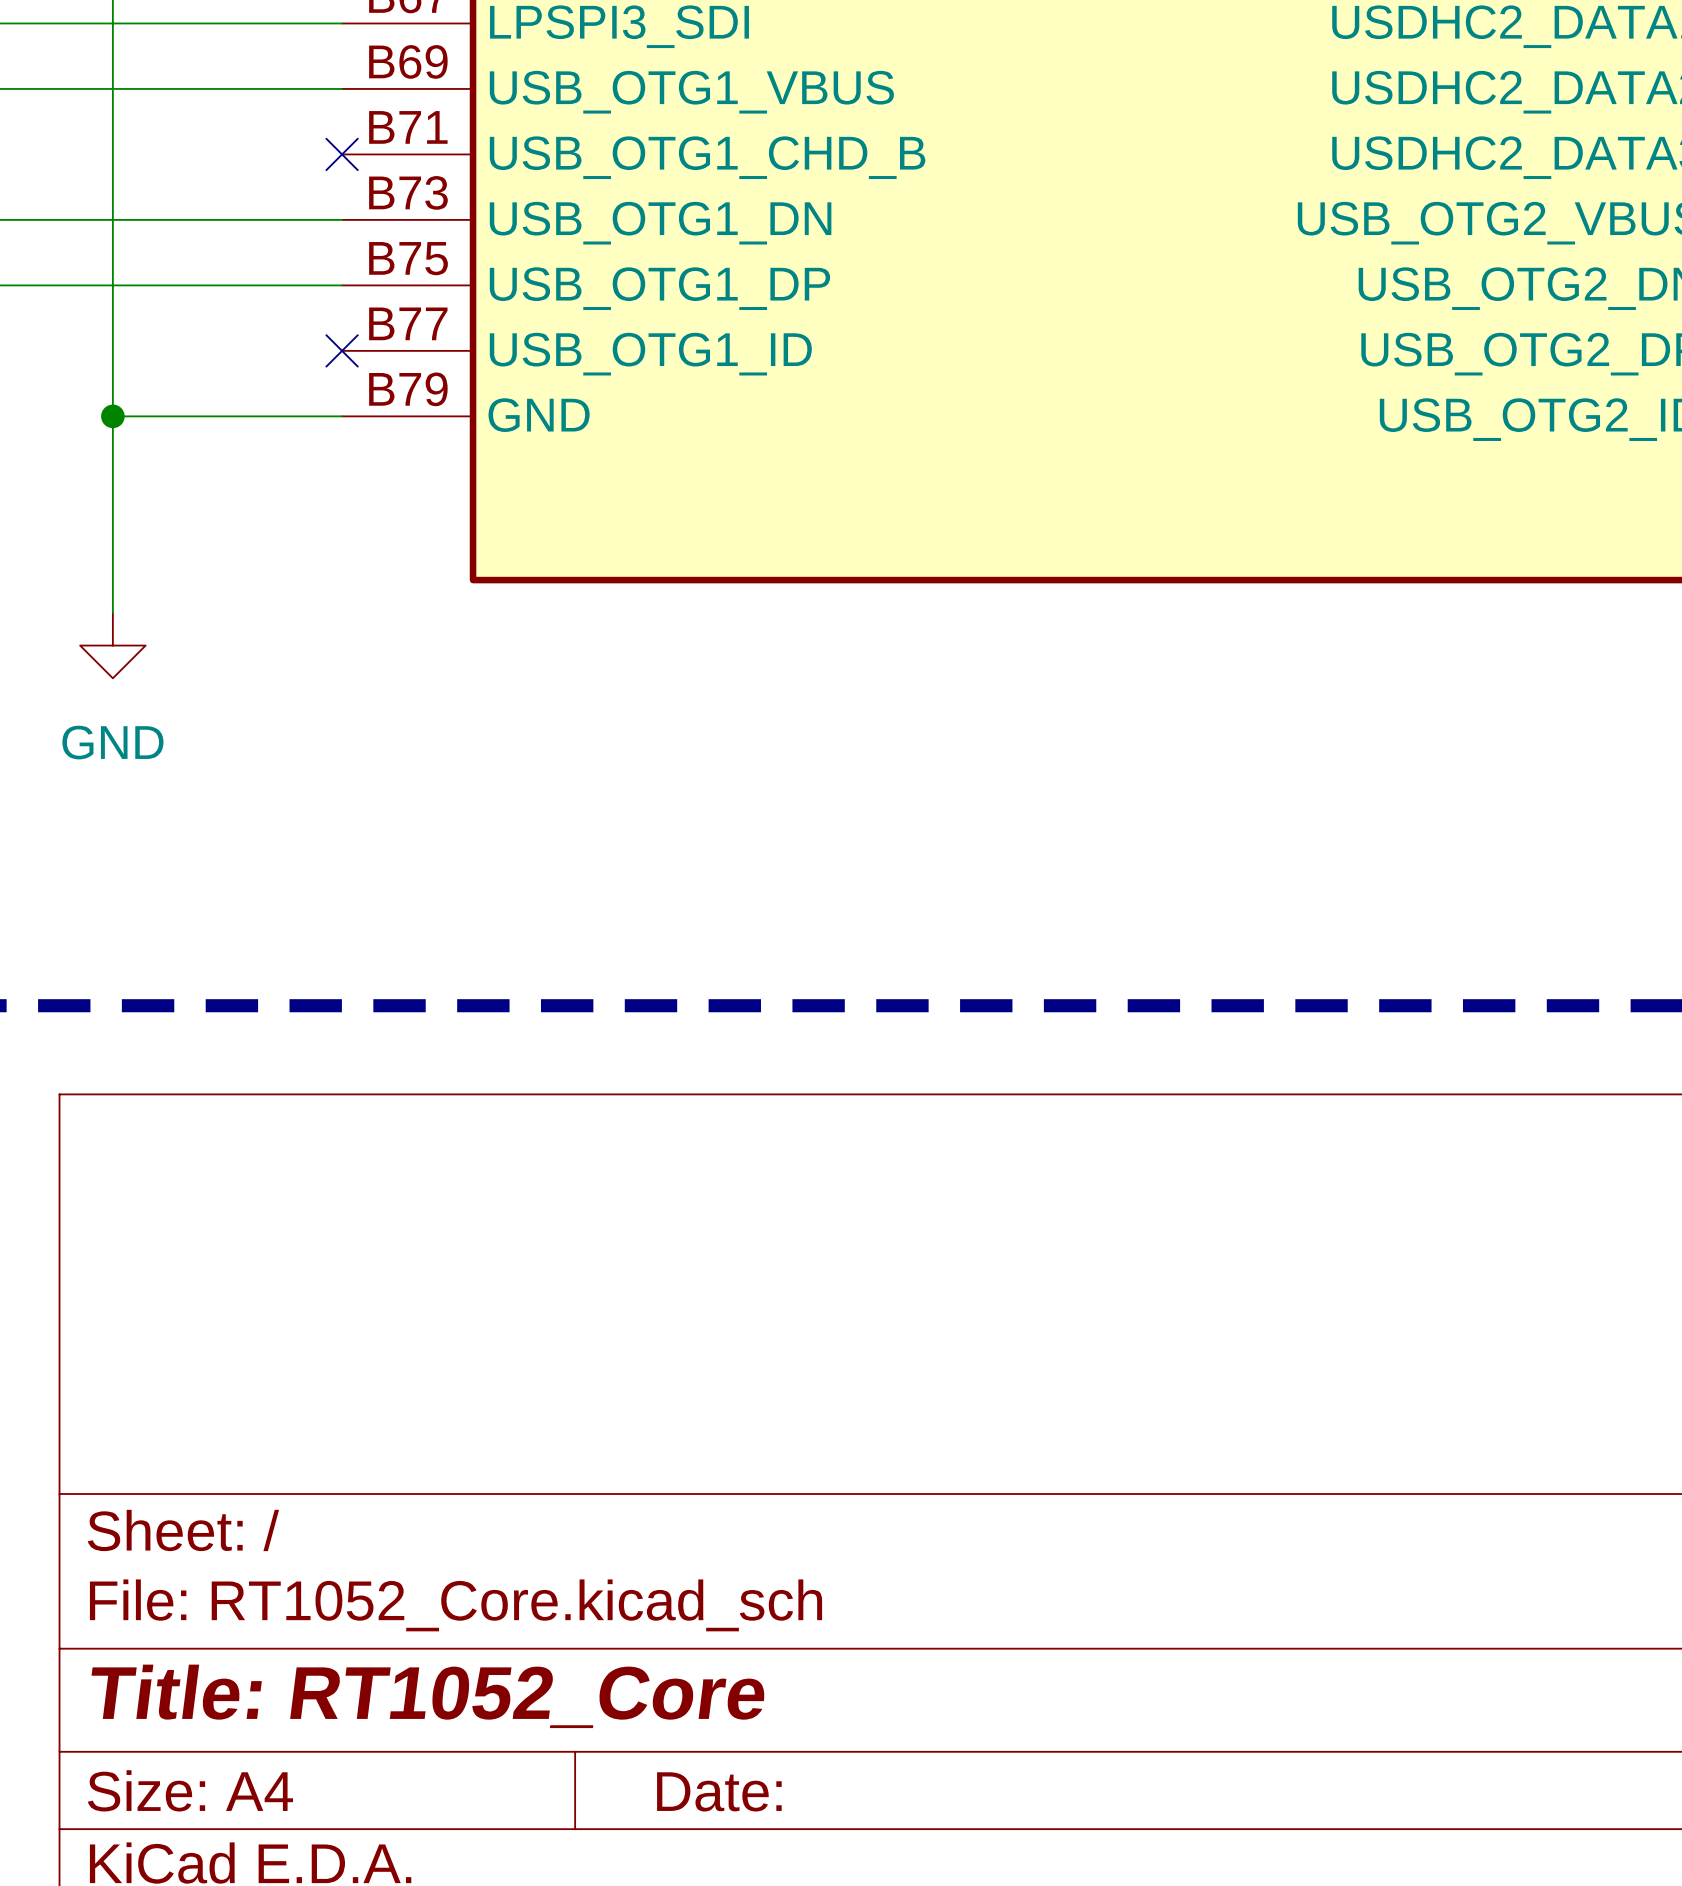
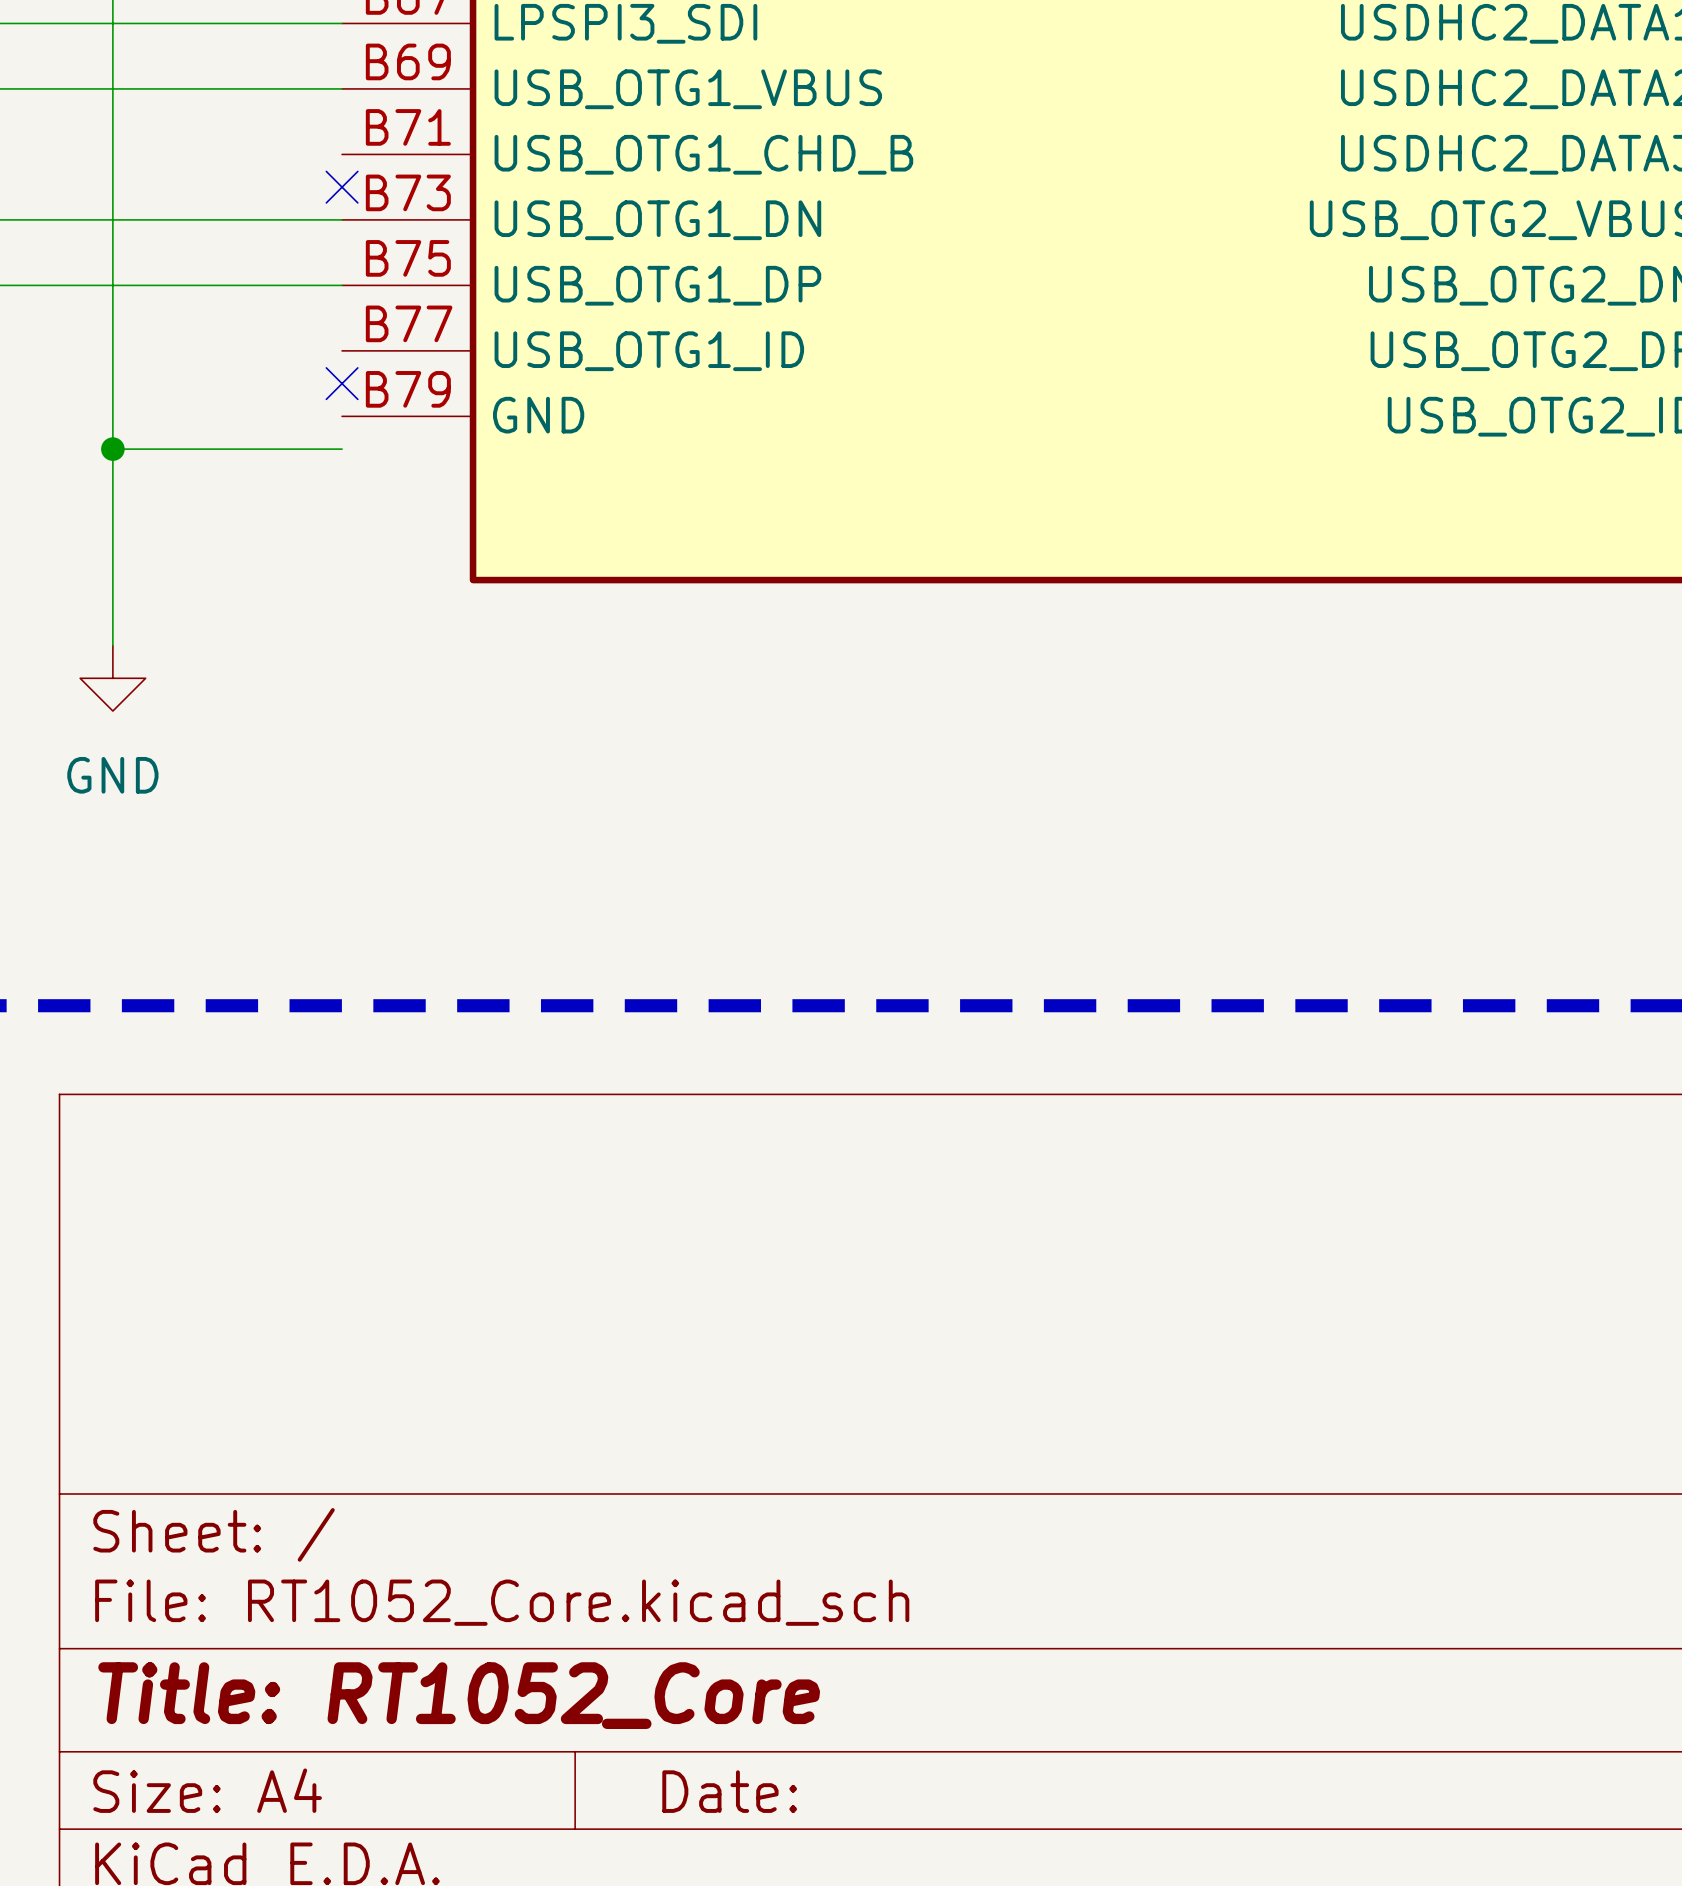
no-connect mark position: (342, 154) -> (342, 187)
no-connect mark position: (342, 350) -> (342, 383)
wire: (112, 416) (342, 416) -> (112, 449) (342, 449)
junction position: (112, 416) -> (112, 449)
power symbol position: GND (112, 645) -> GND (112, 678)

